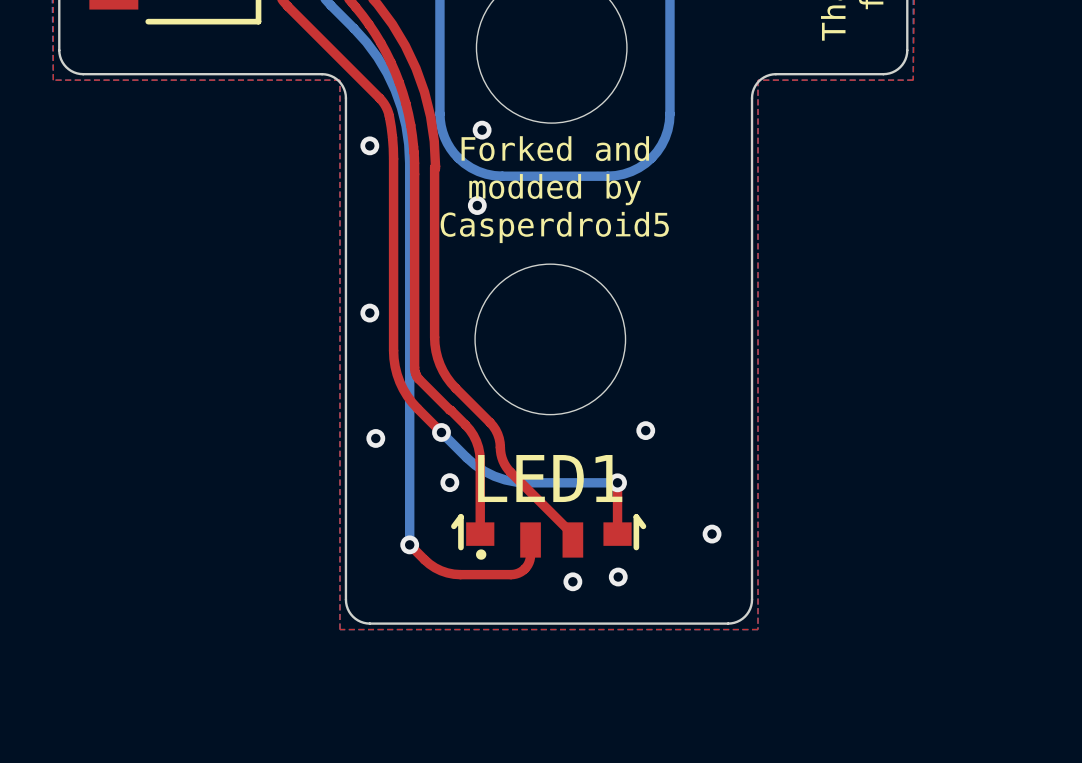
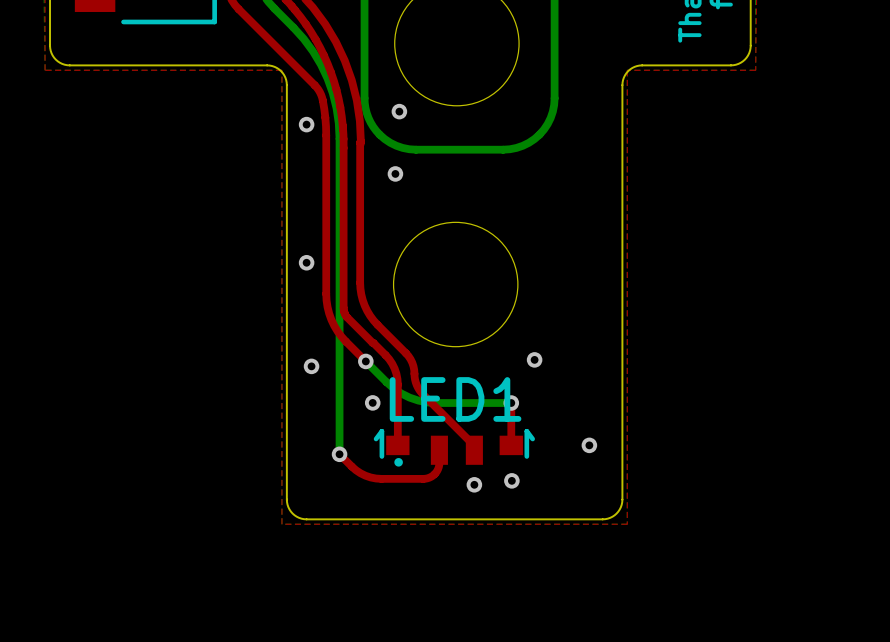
text: Forked and (555, 148) -> none
text: modded by (555, 189) -> none
text: Casperdroid5 (554, 227) -> none

